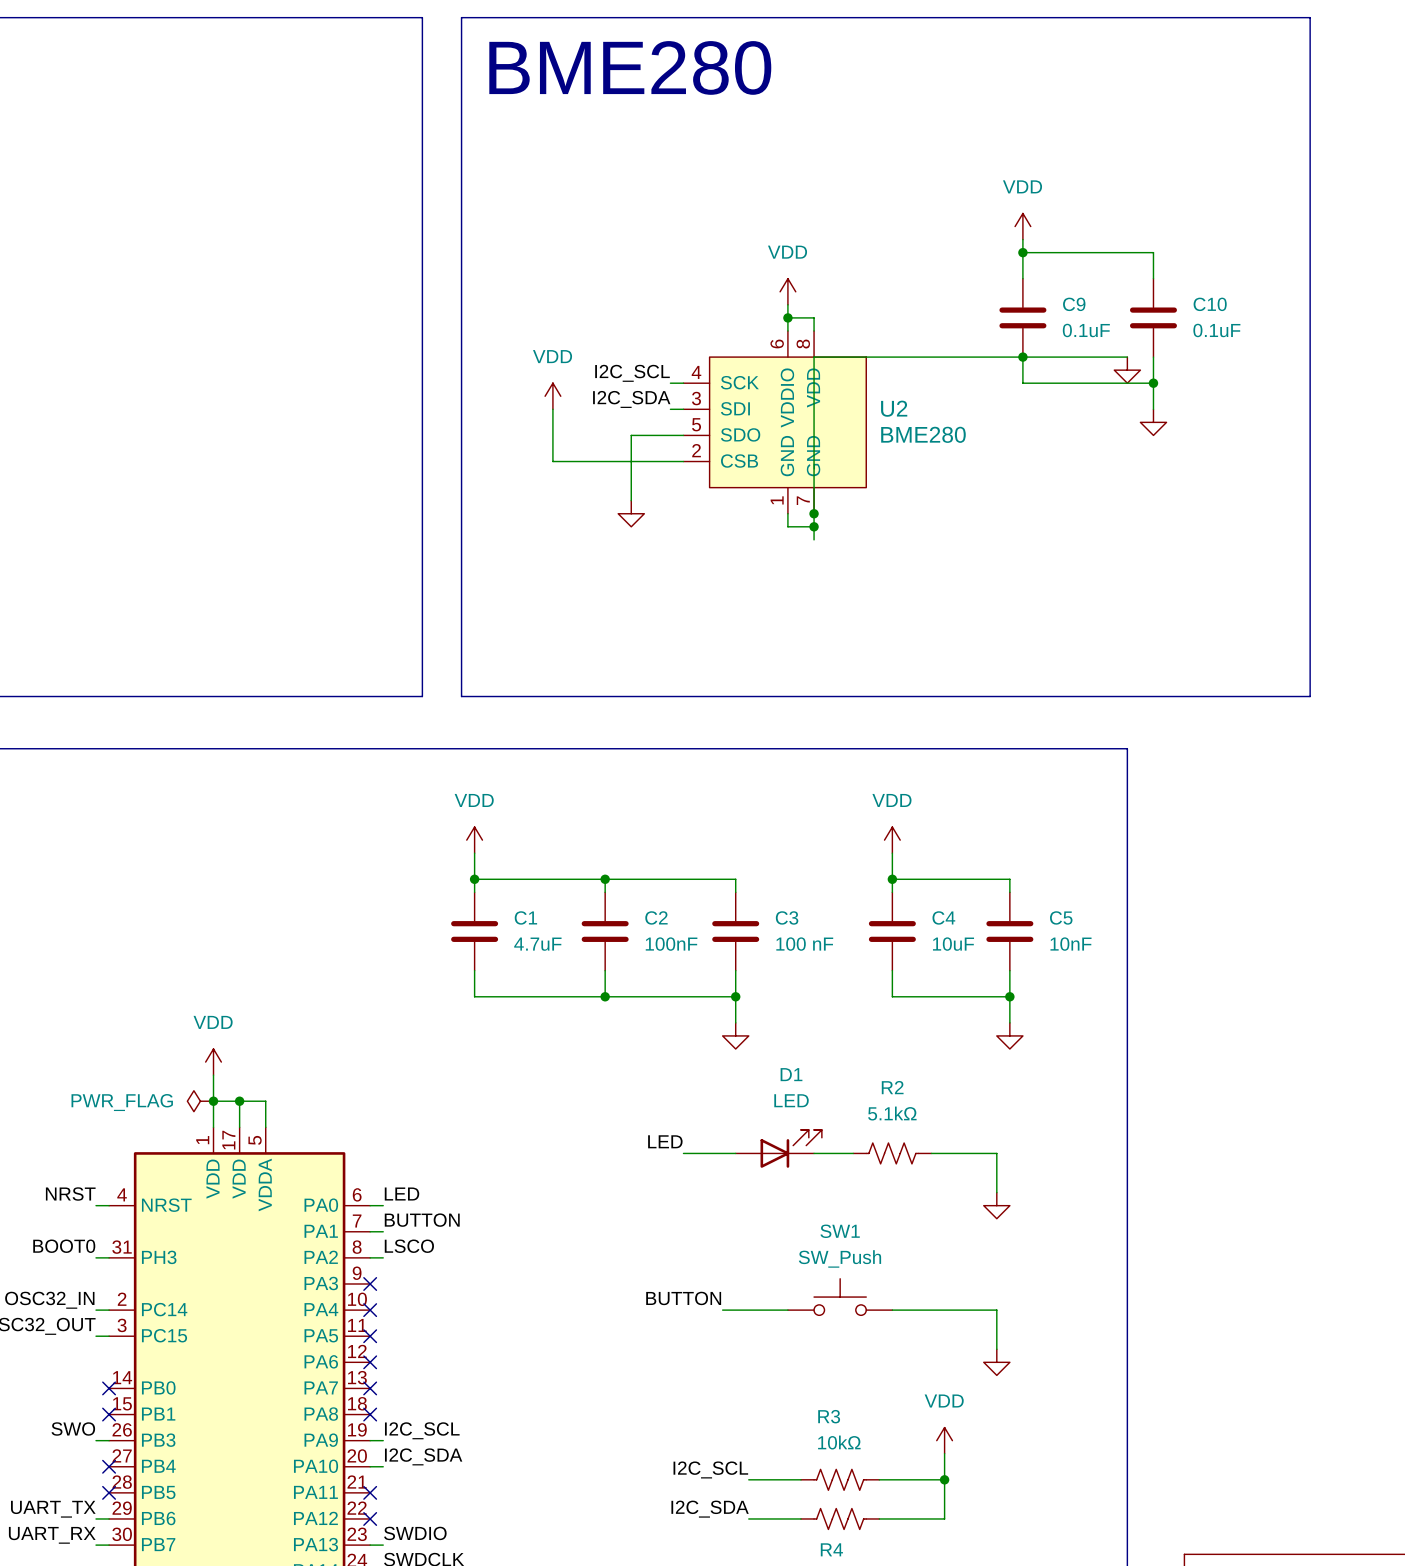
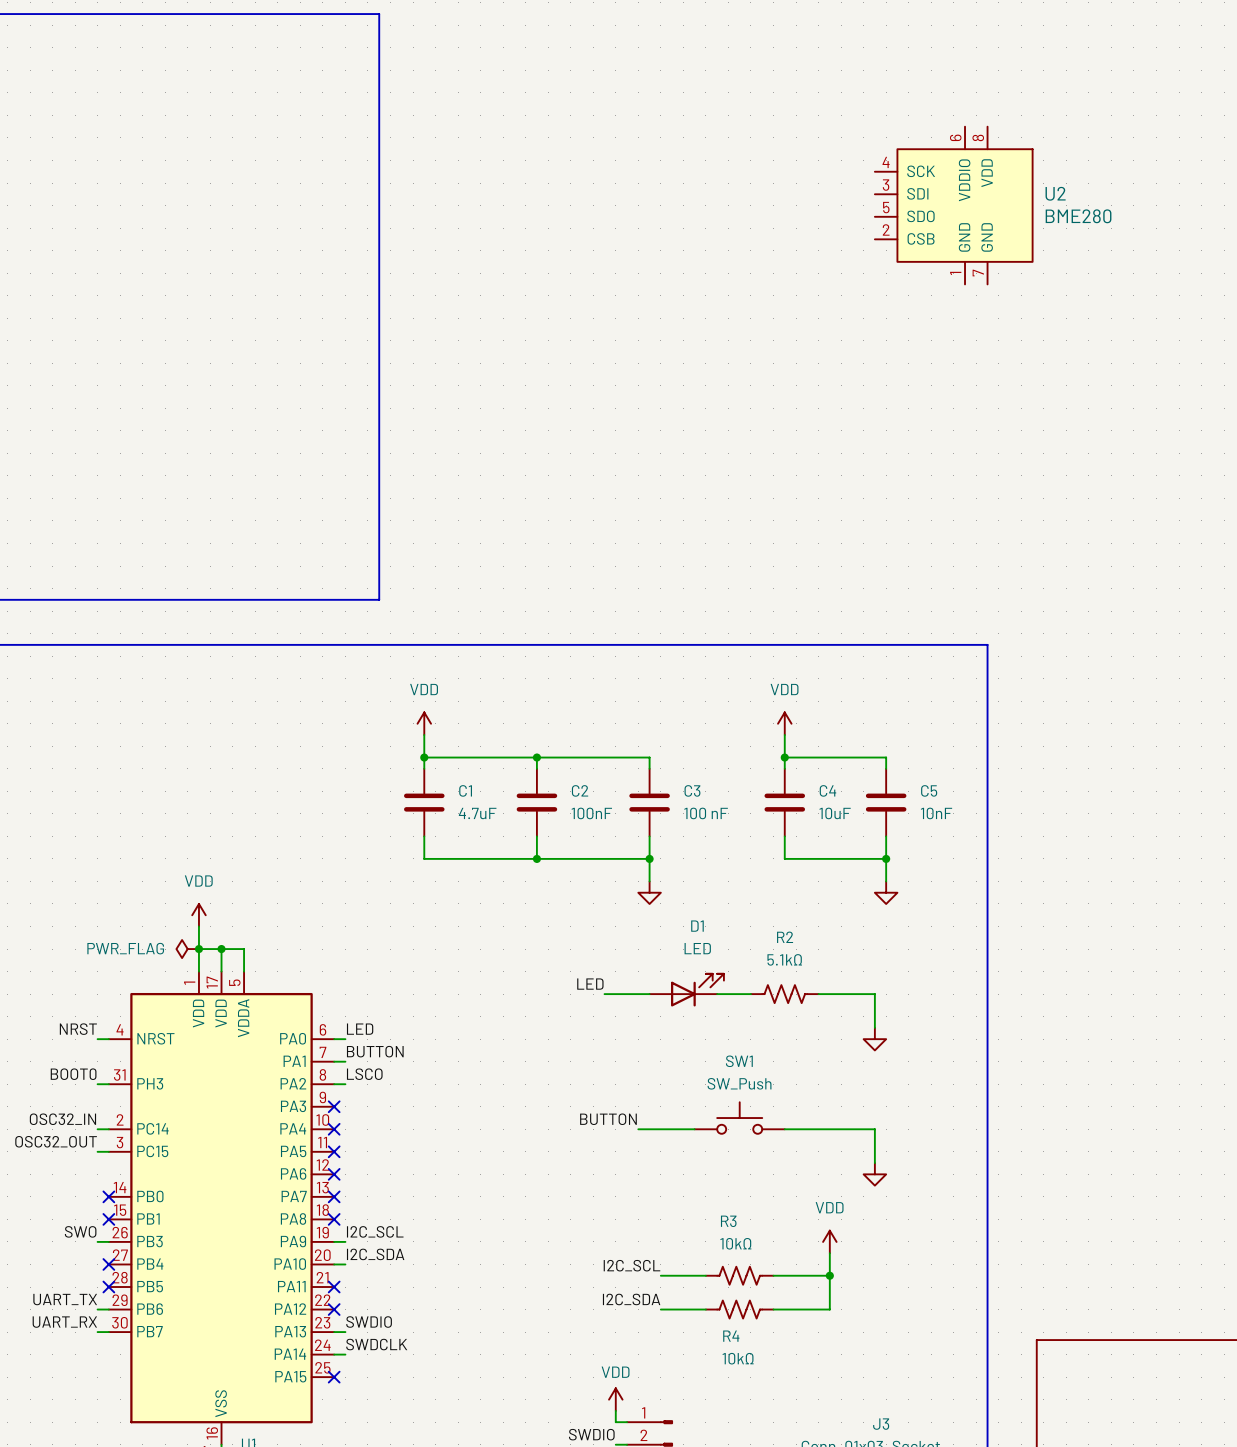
line: (461, 17) (1310, 17) (1310, 696) (461, 696) (461, 17) -> none
text: BME280 (630, 67) -> none
power symbol: VDD (1022, 226) -> none
junction: (1022, 252) -> none
power symbol: VDD (787, 291) -> none
wire: (787, 304) (787, 330) -> none
wire: (787, 317) (814, 317) (814, 330) -> none
junction: (787, 317) -> none
C9: 0.1uF (1022, 317) -> none
C10: 0.1uF (1153, 317) -> none
wire: (1022, 357) (1022, 383) (1153, 383) -> none
junction: (1022, 357) -> none
wire: (1127, 357) (814, 357) (814, 539) -> none
wire: (1153, 357) (1153, 409) -> none
power symbol: (1127, 370) -> none
label: I2C_SCL (632, 373) -> none
wire: (670, 383) (683, 383) -> none
junction: (1153, 383) -> none
power symbol: VDD (552, 396) -> none
label: I2C_SDA (631, 399) -> none
wire: (552, 409) (552, 461) (683, 461) -> none
wire: (670, 409) (683, 409) -> none
U2 position: (774, 422) -> (953, 205)
power symbol: (1153, 422) -> none
wire: (683, 435) (631, 435) (631, 500) -> none
power symbol: (631, 513) -> none
wire: (787, 513) (787, 526) (814, 526) -> none
junction: (814, 513) -> none
junction: (814, 526) -> none

